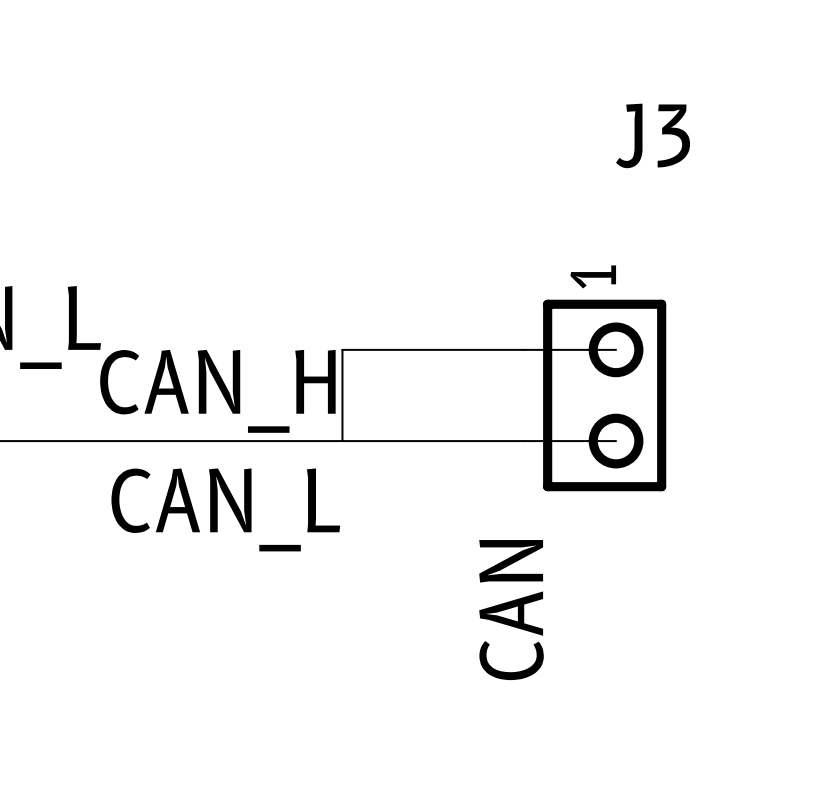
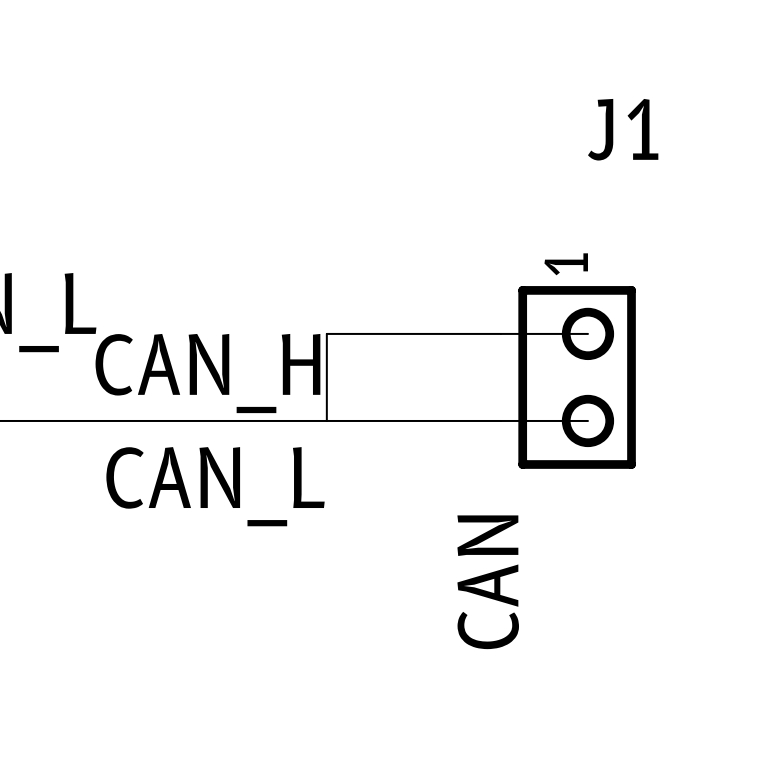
J3 name: J3 (653, 135) -> J1 (623, 129)

